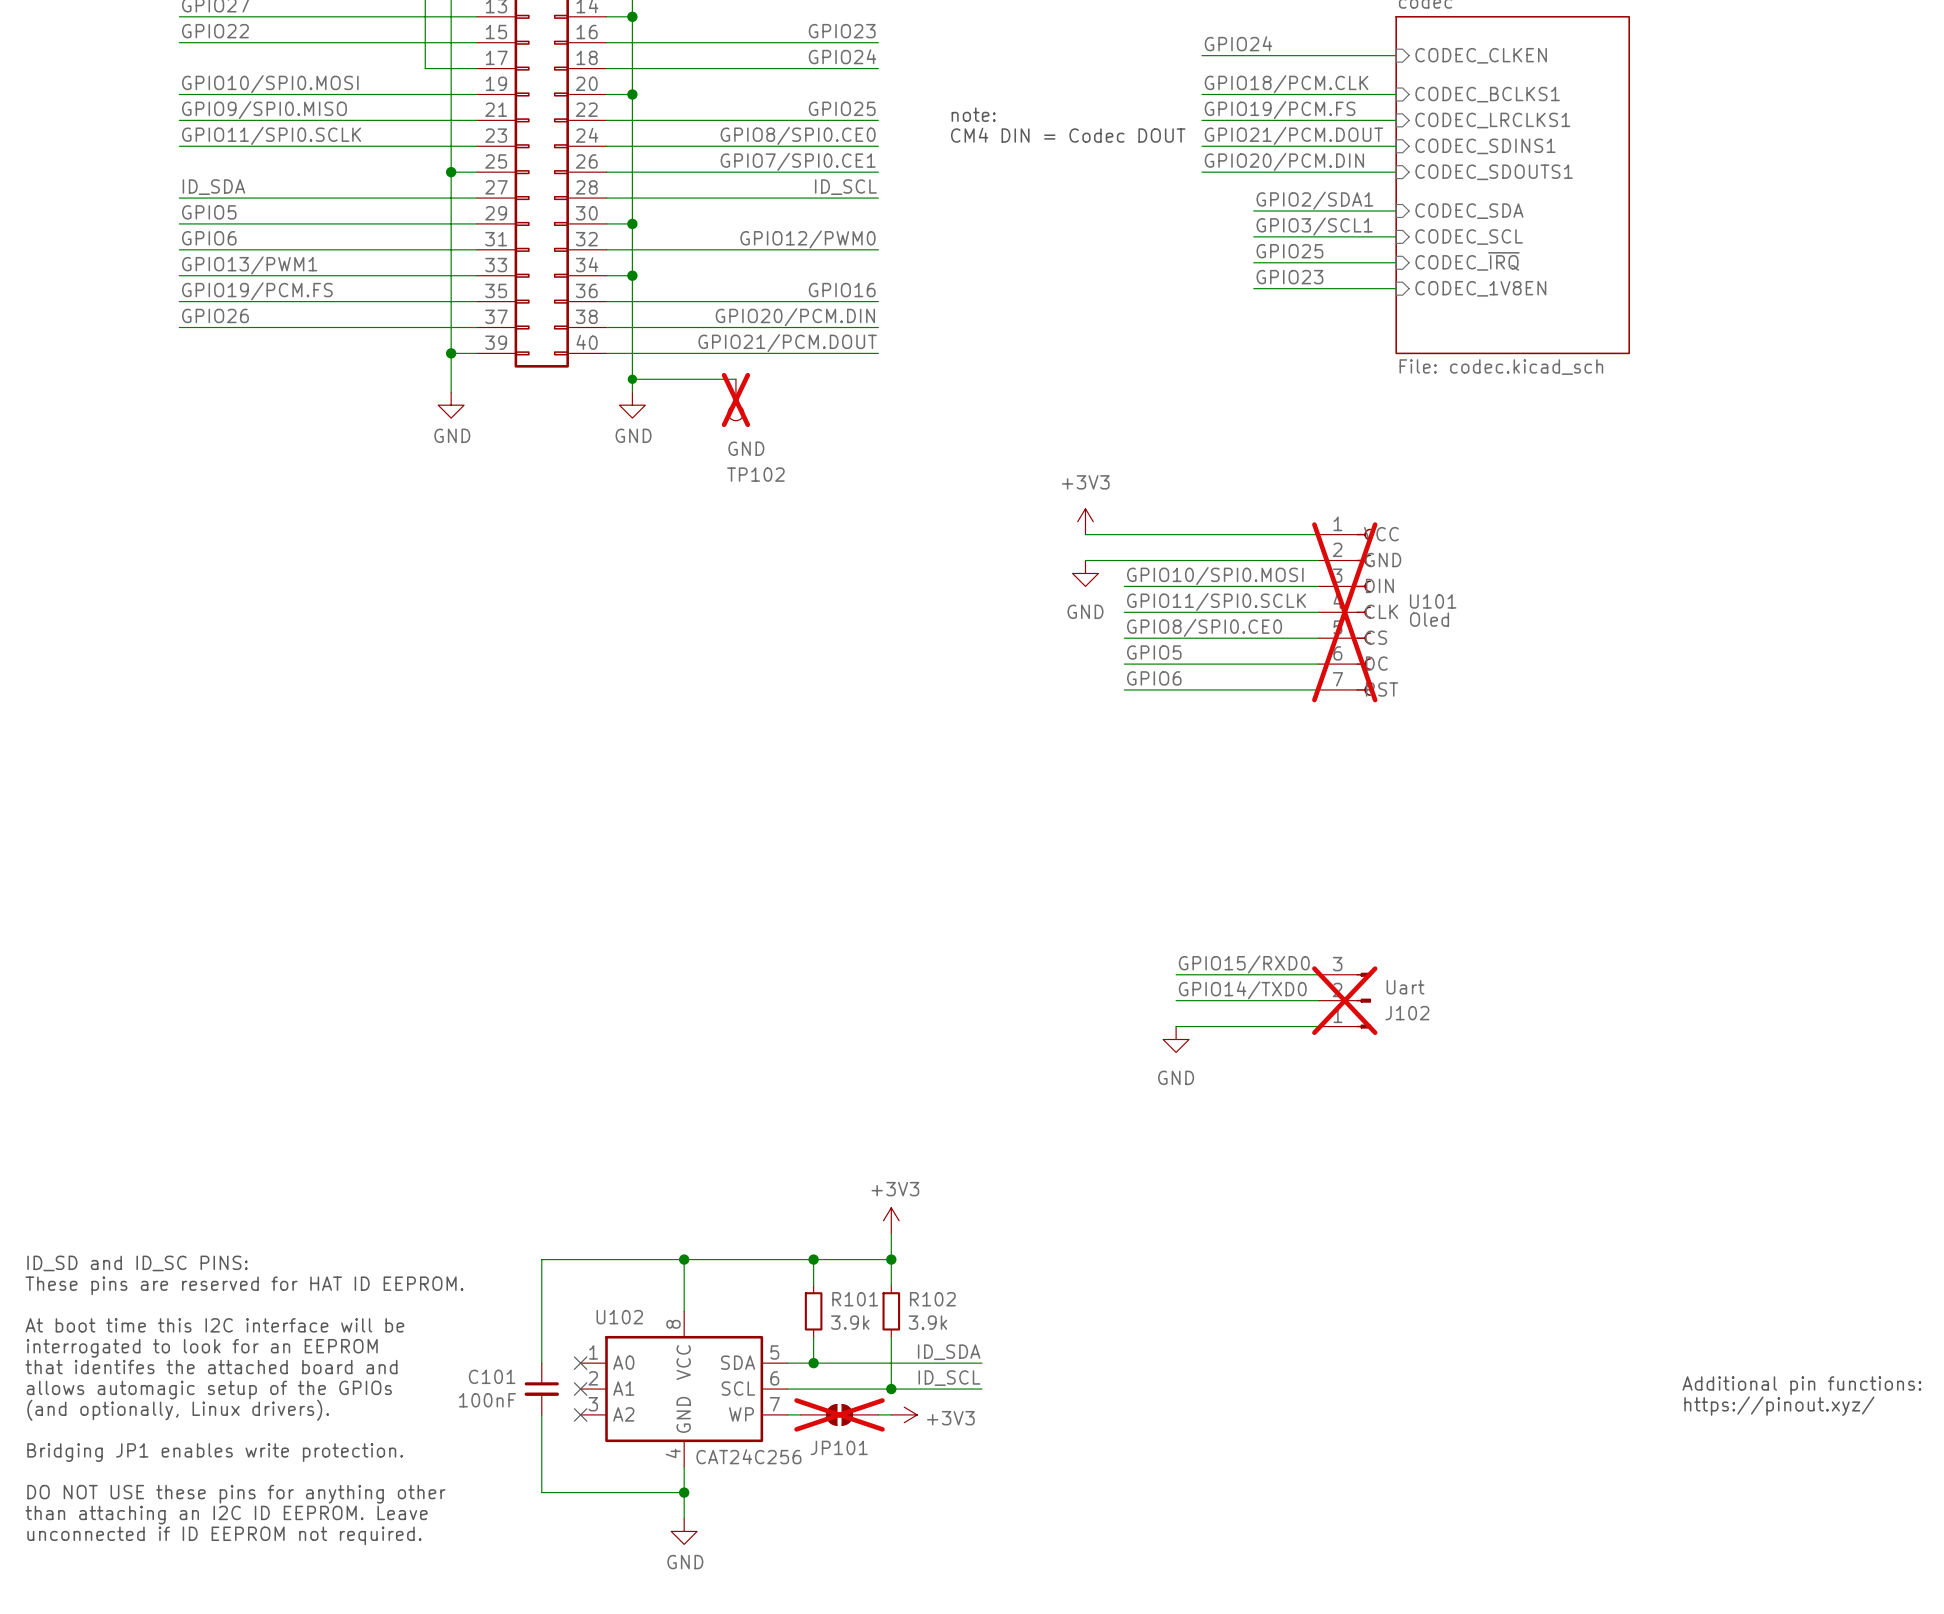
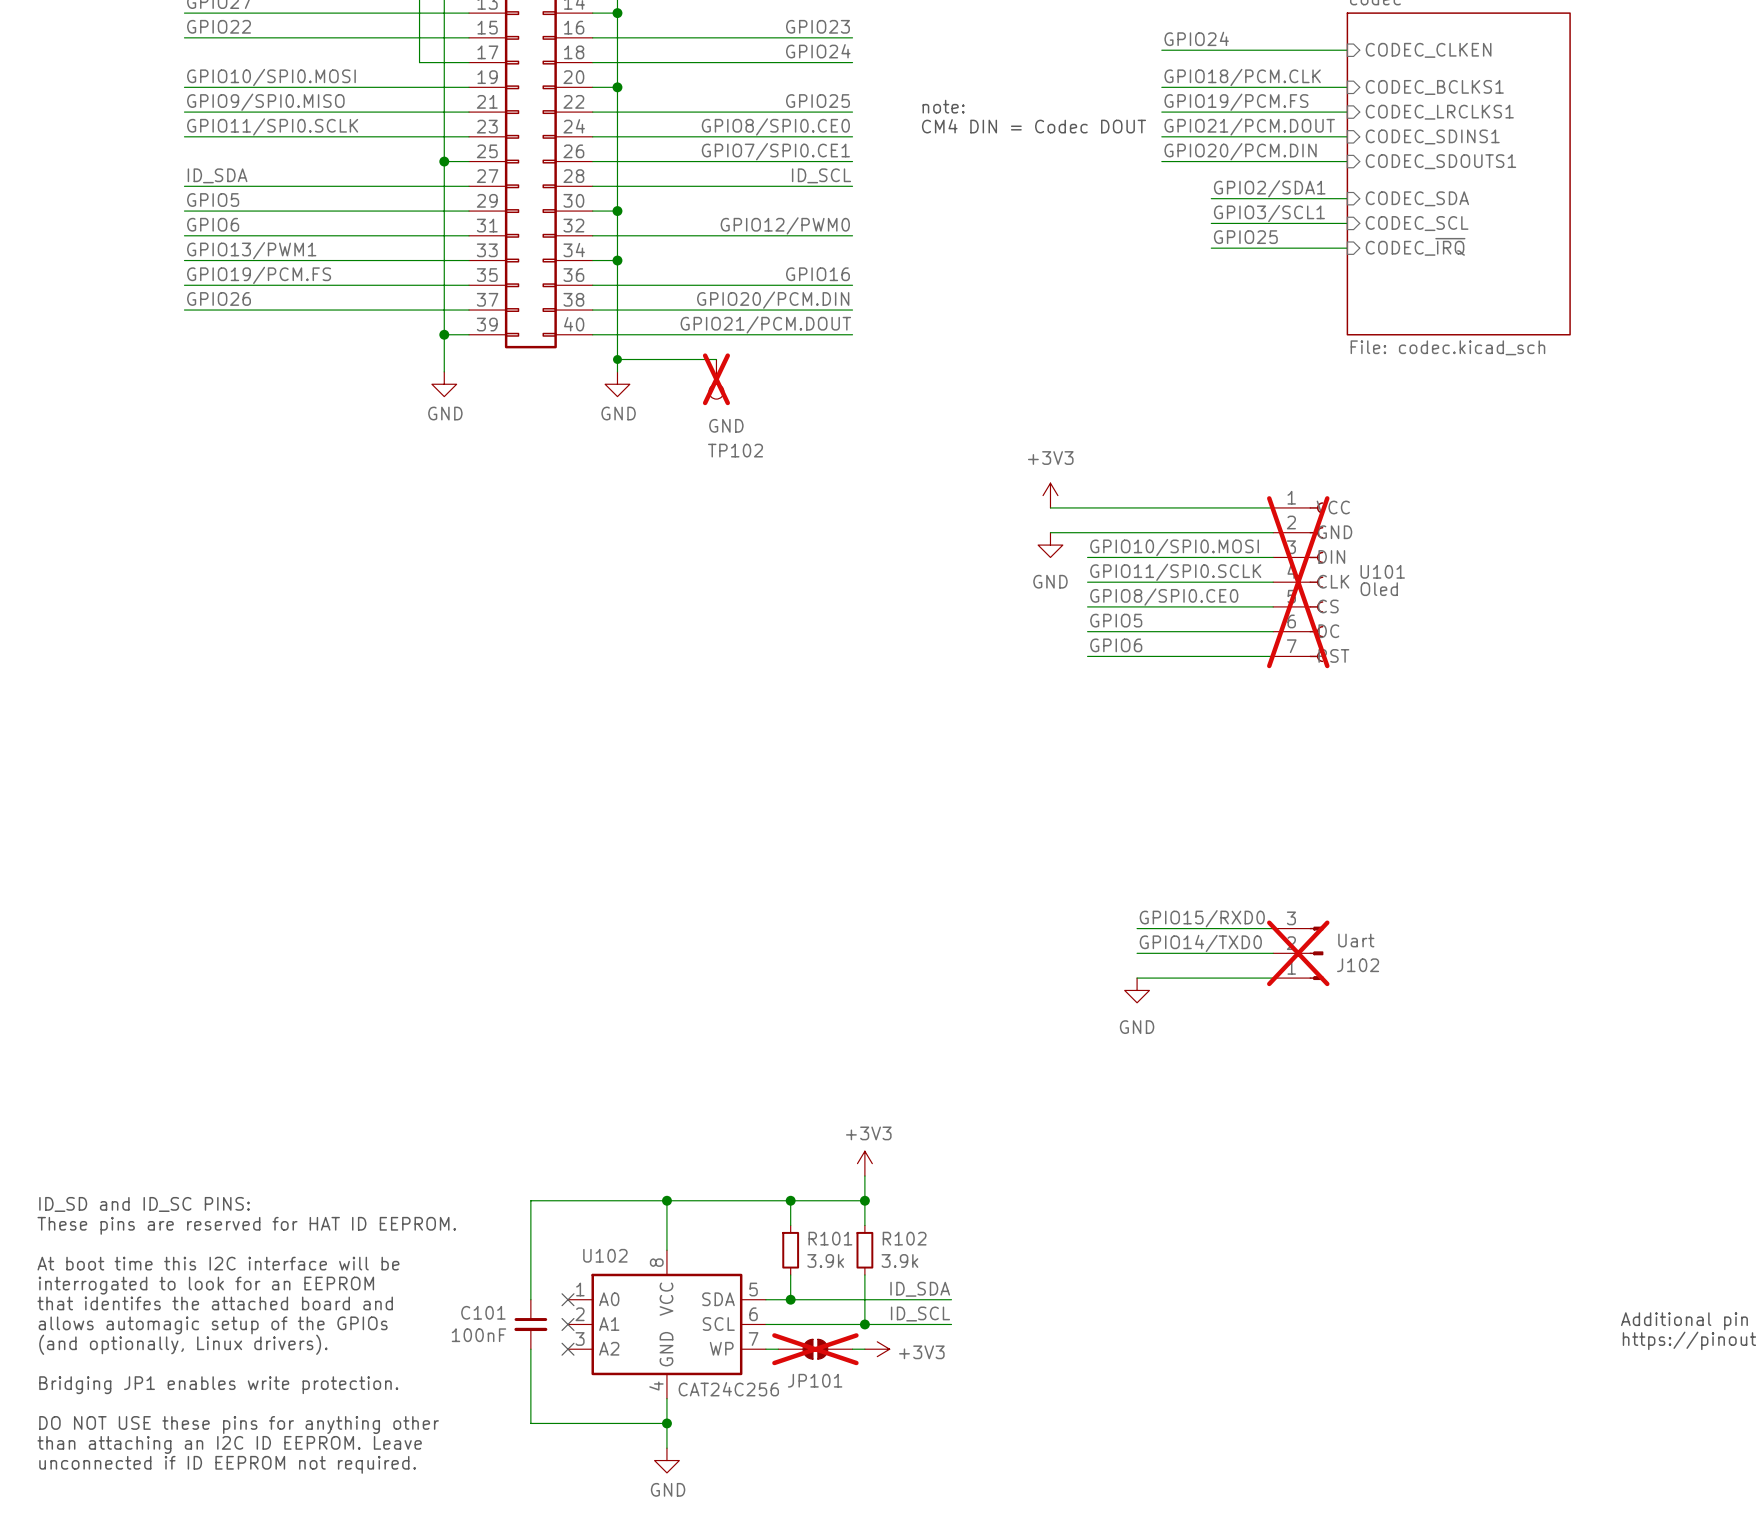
label: GPIO23 (1289, 277) -> none
wire: (1253, 288) (1396, 288) -> none
sheet pin: CODEC_1V8EN (1480, 288) -> none

